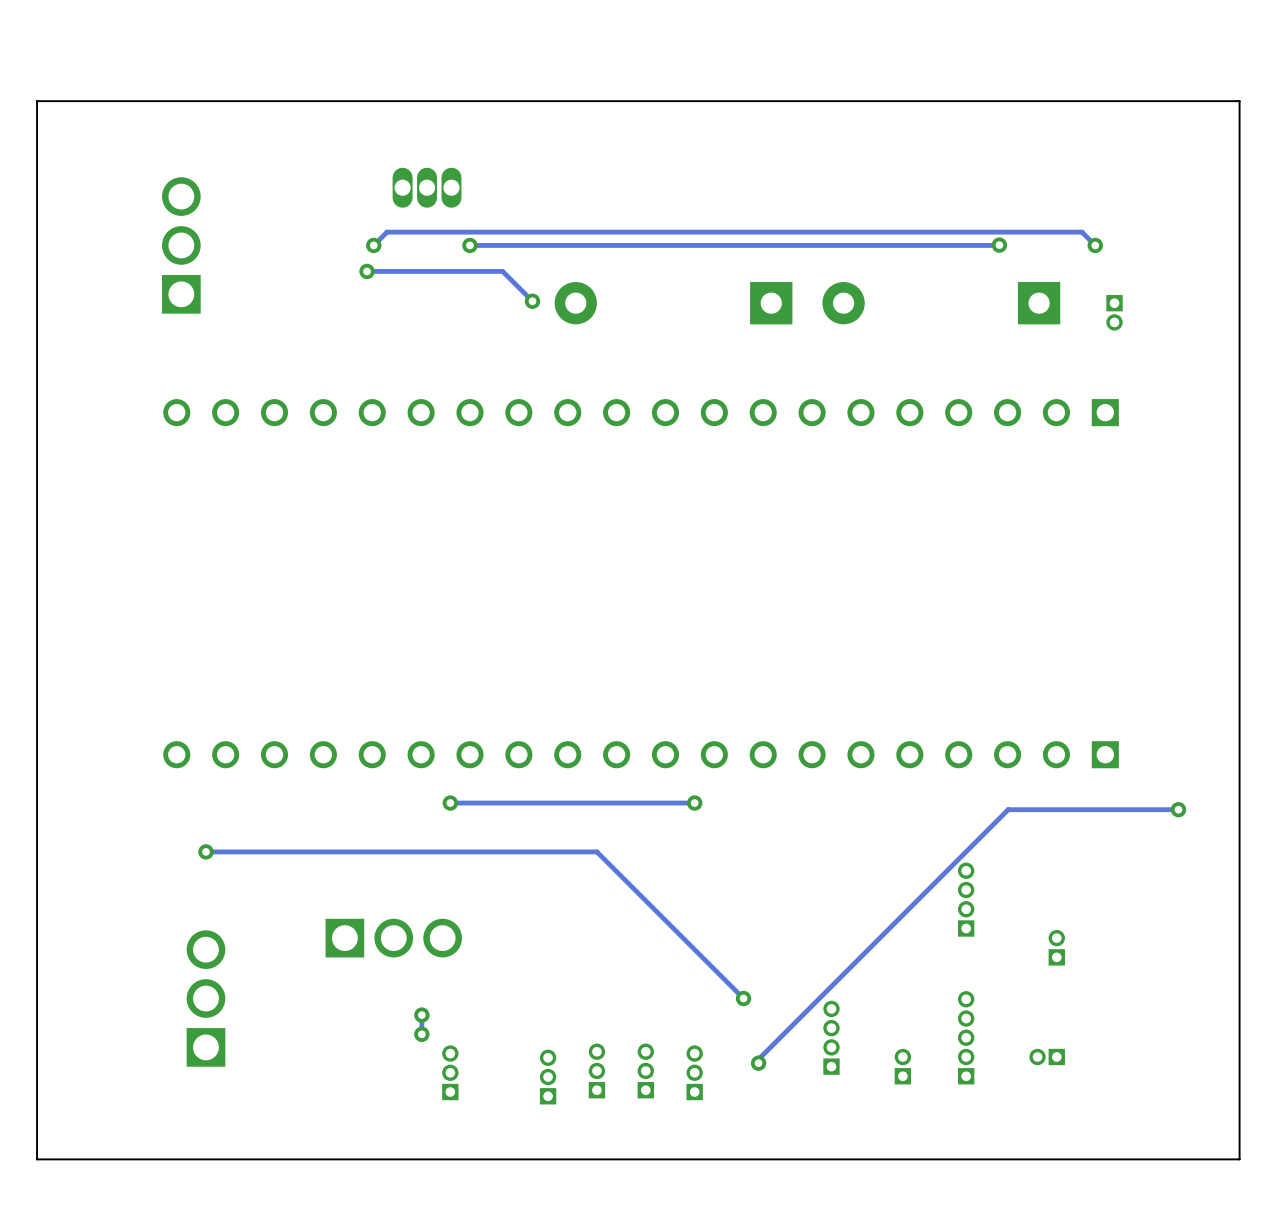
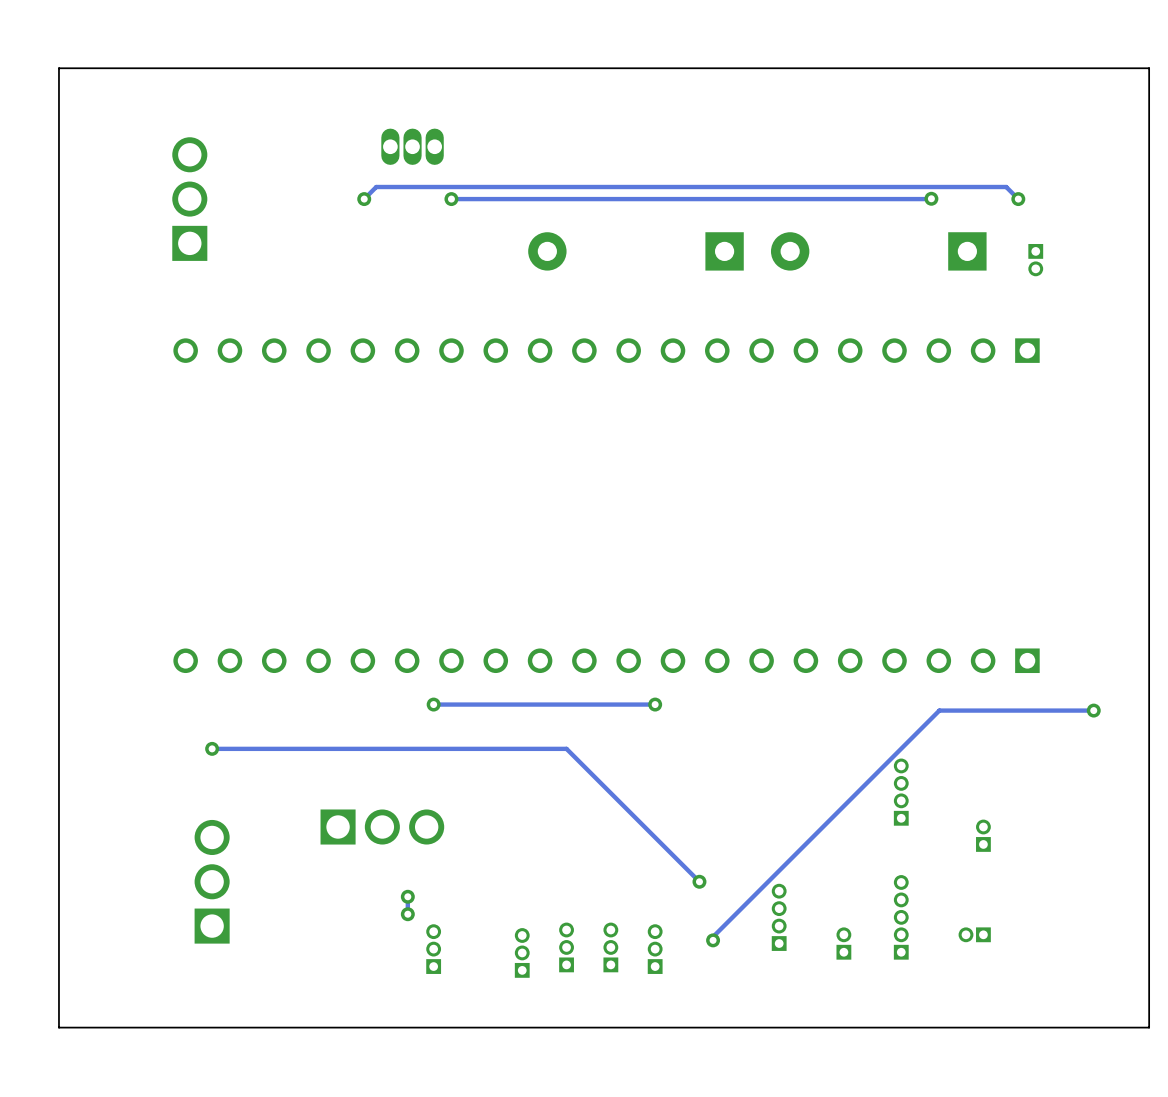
track: (367, 271) (502, 271) (532, 301) -> none
via: (367, 271) -> none
via: (532, 301) -> none

